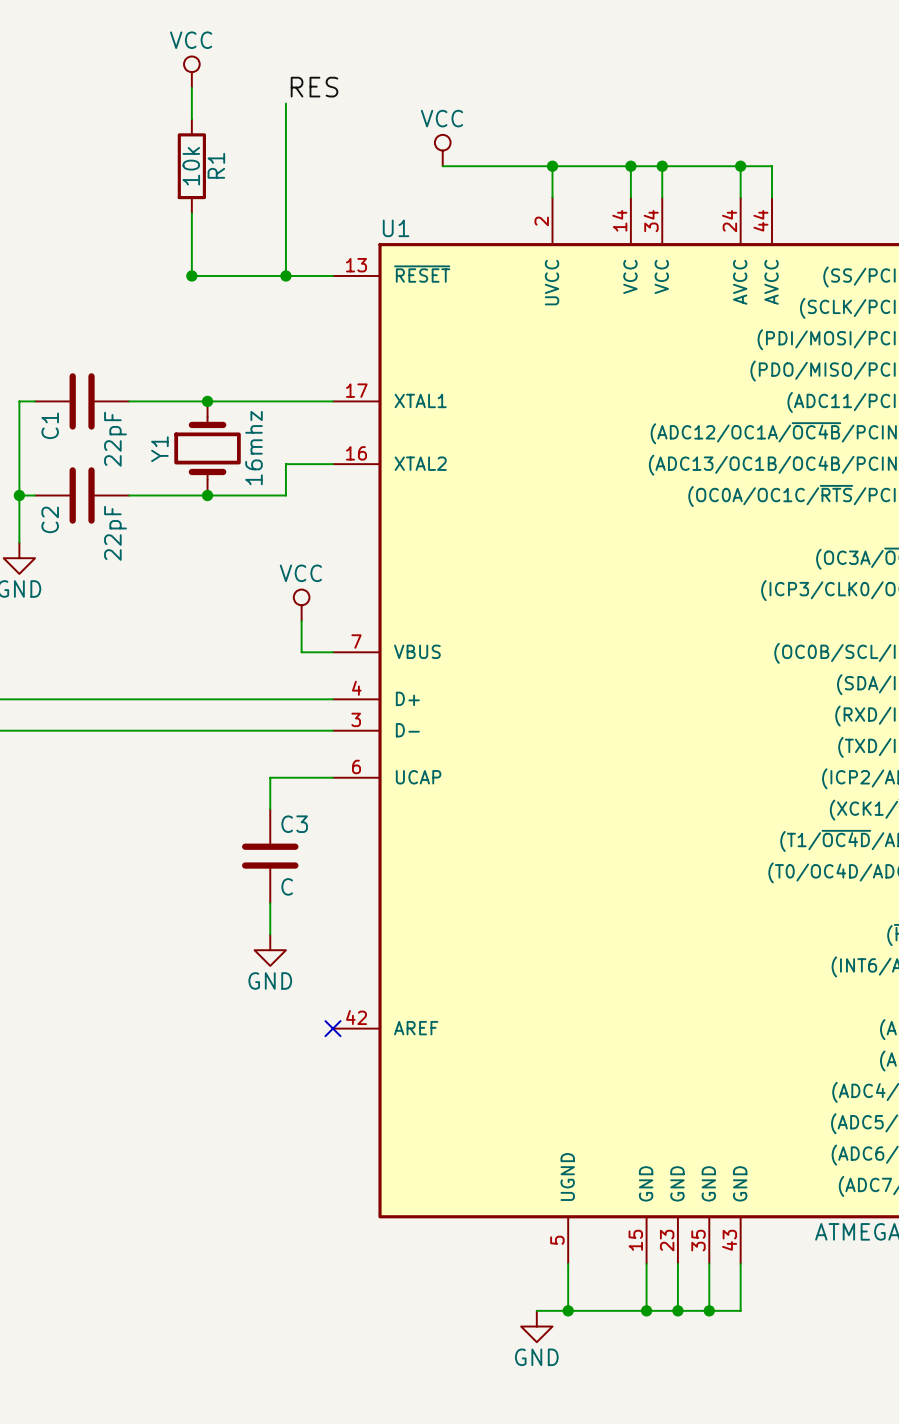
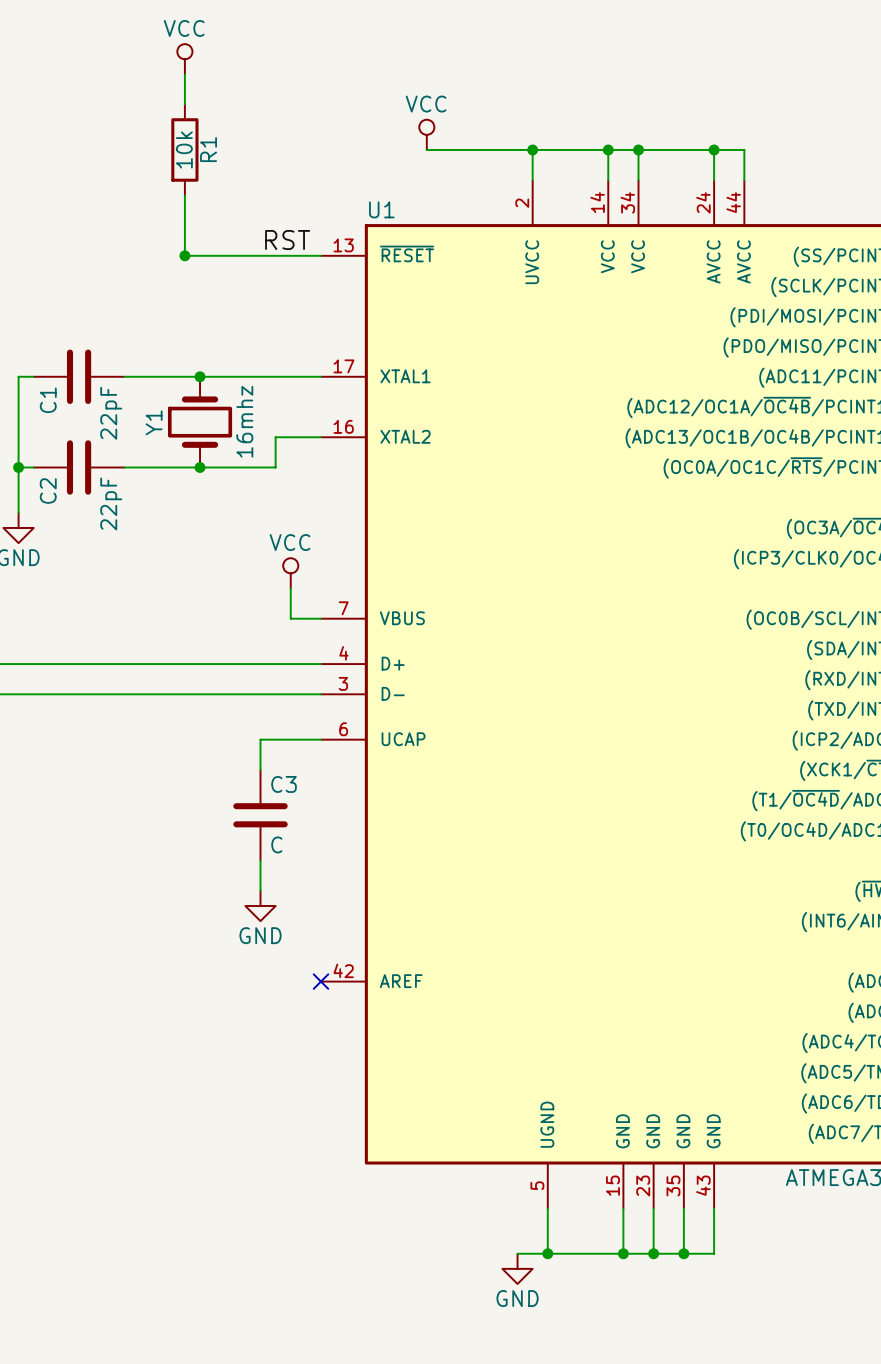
label: RES (314, 87) -> none
wire: (285, 103) (285, 275) -> none
label: none -> RST (287, 239)
junction: (285, 275) -> none

